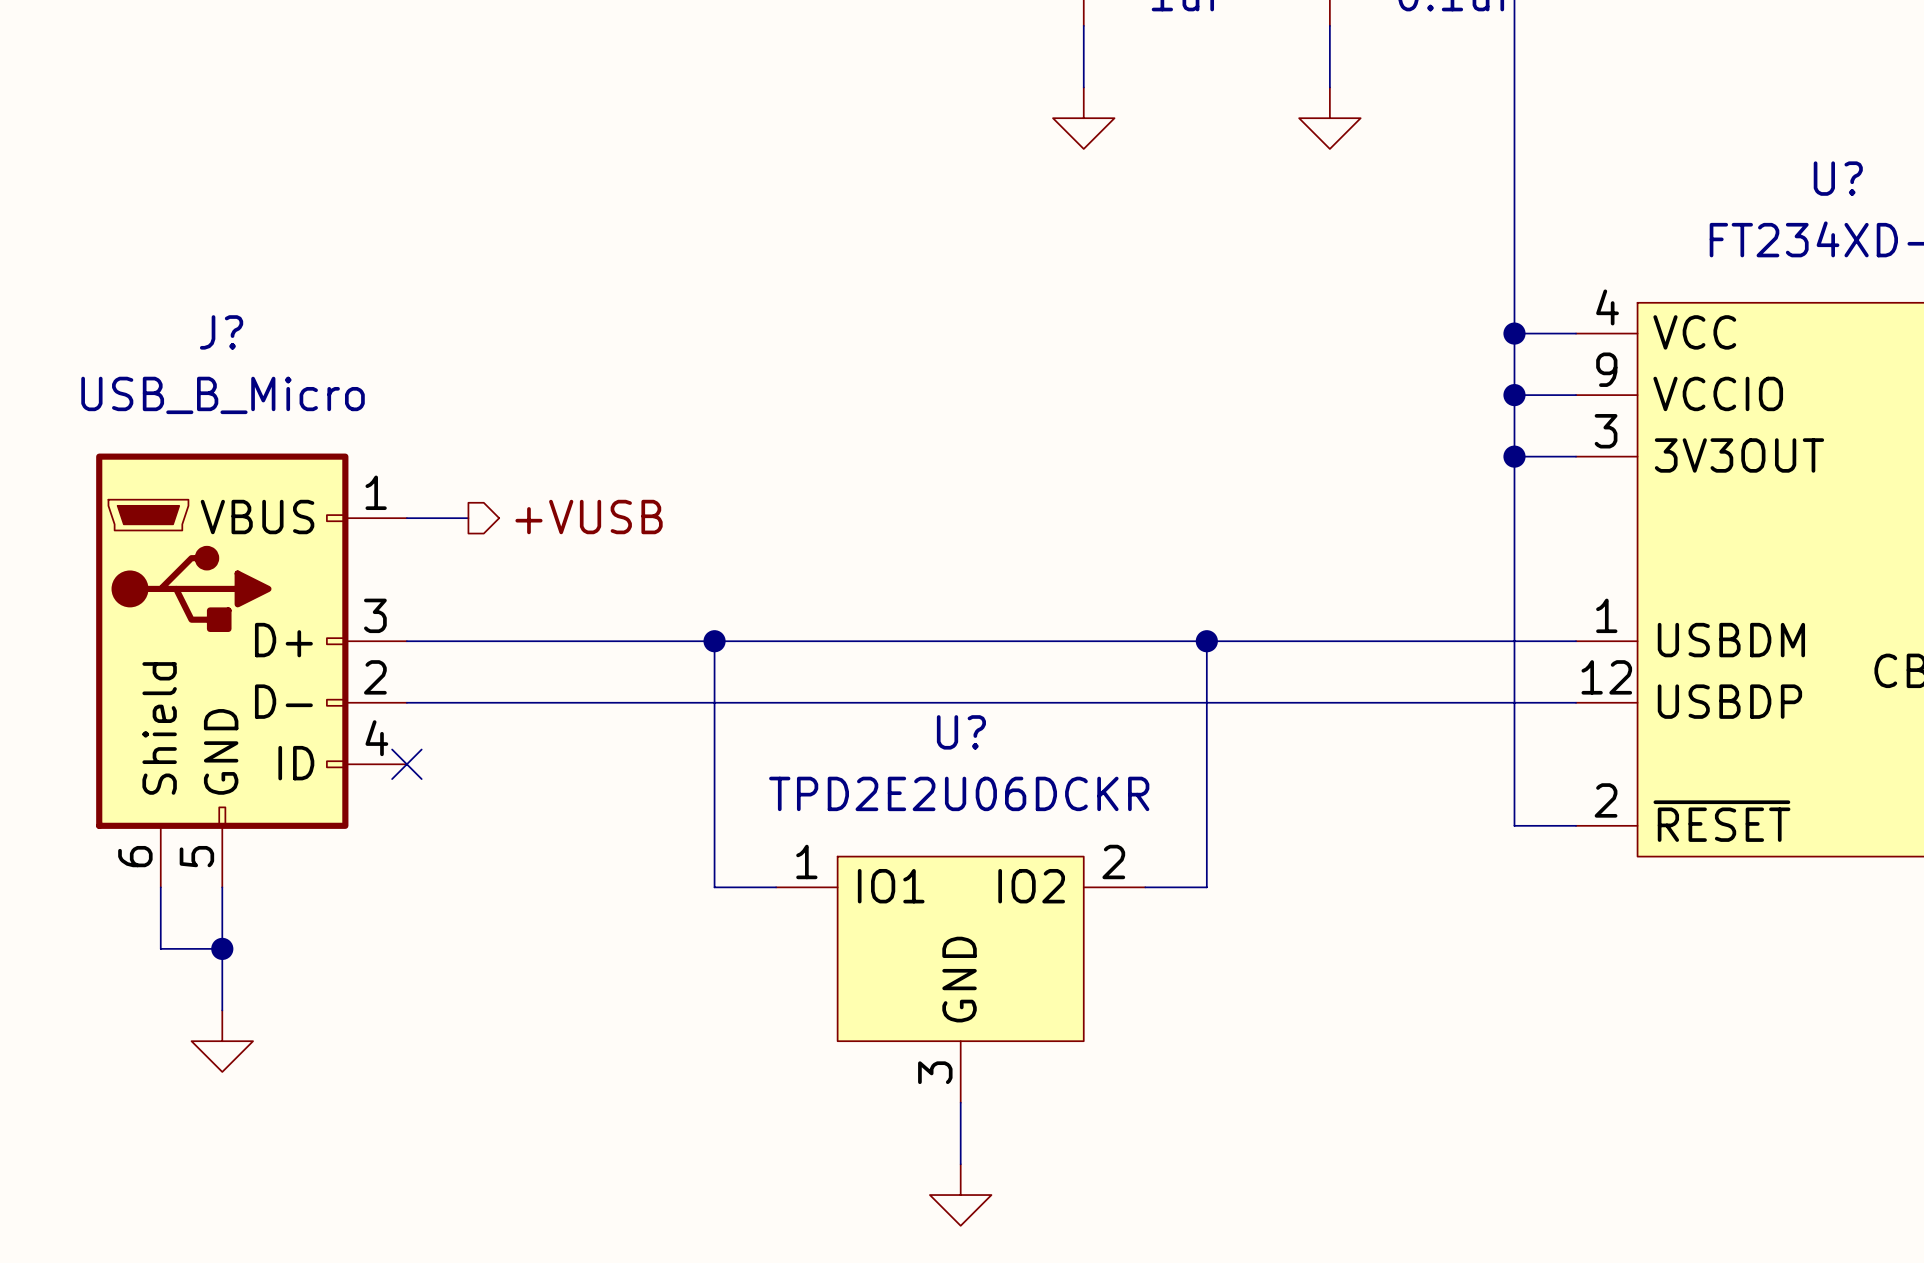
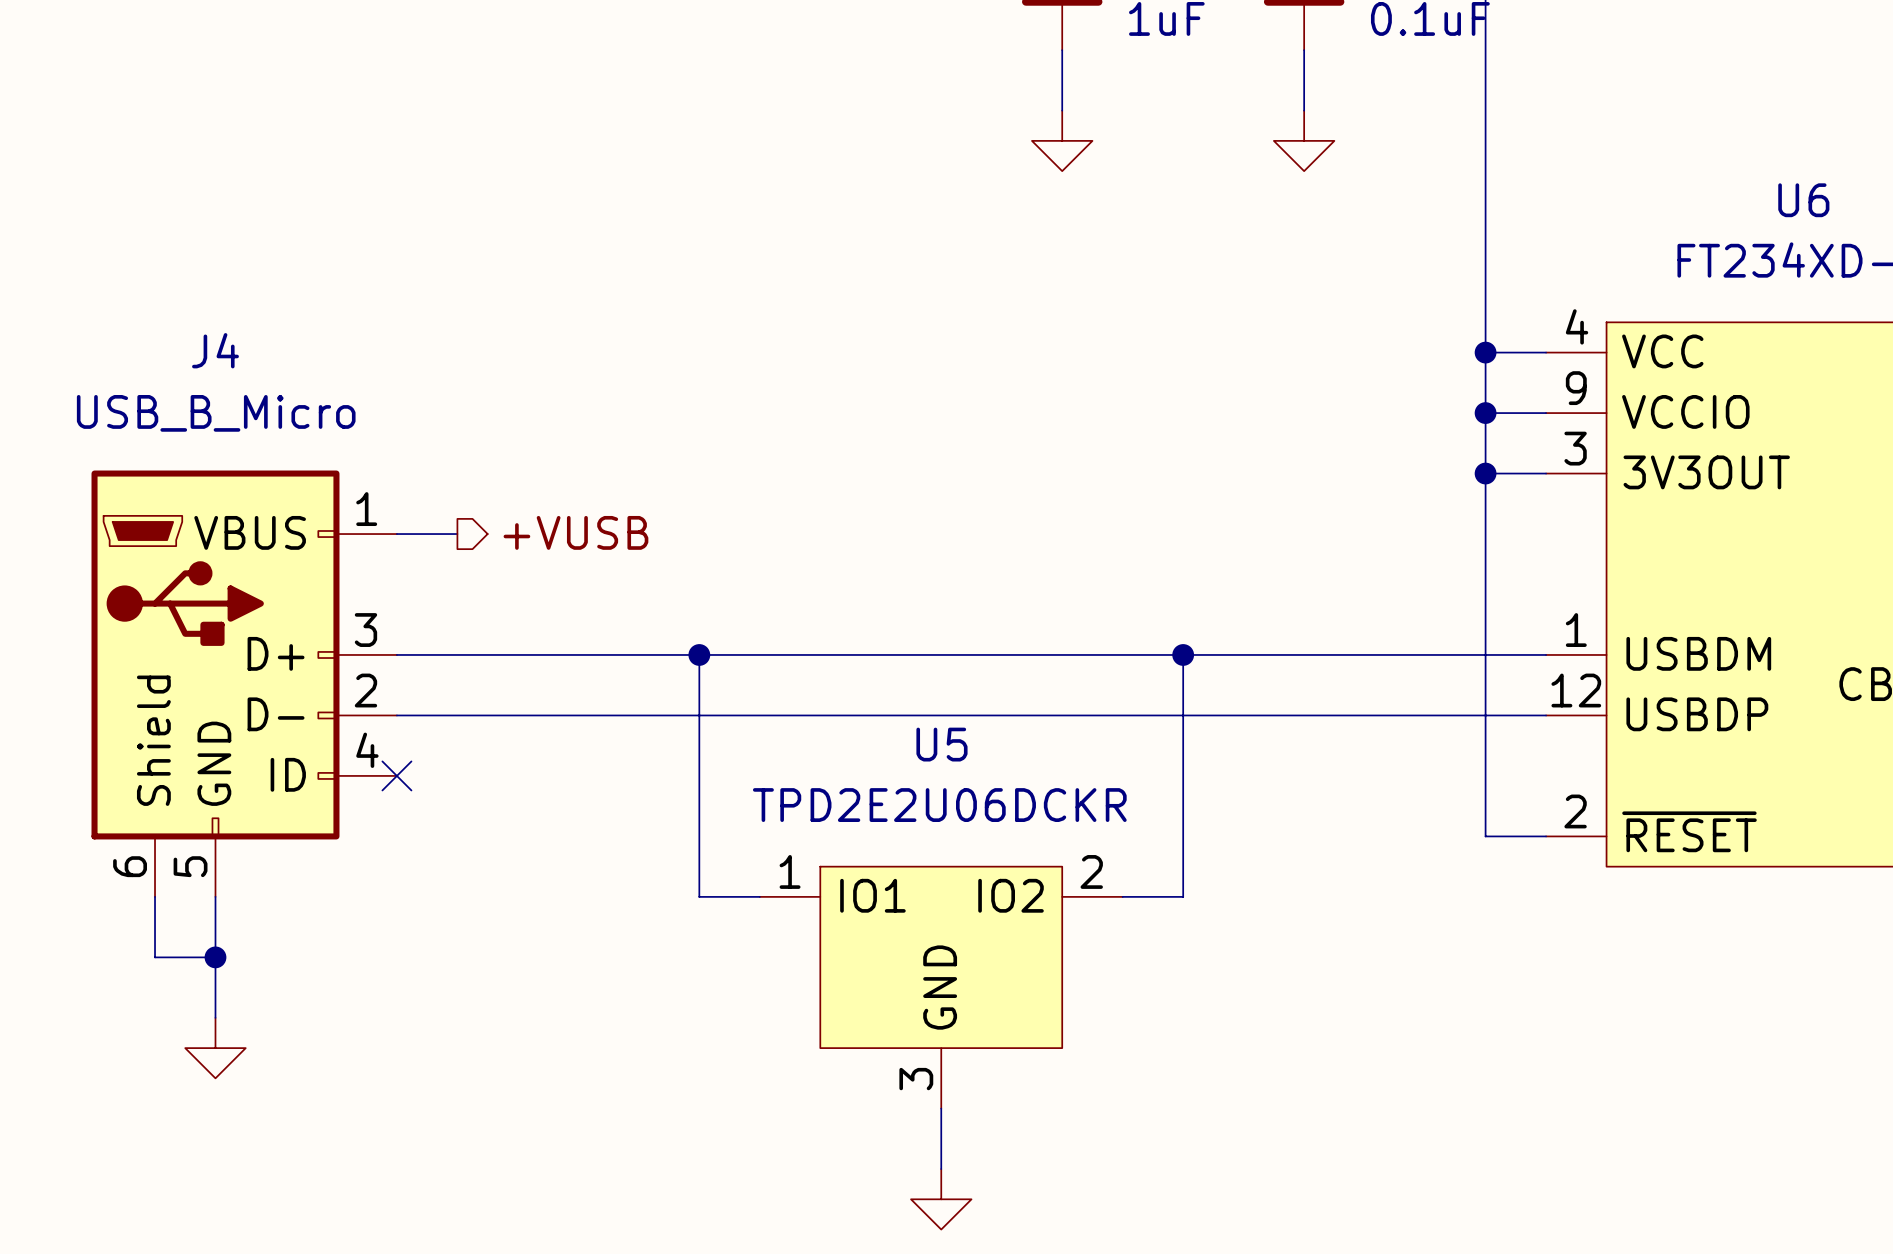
U? name: U? (1838, 178) -> U6 (1803, 200)
J? name: J? (221, 332) -> J4 (215, 350)
U? name: U? (961, 732) -> U5 (941, 744)

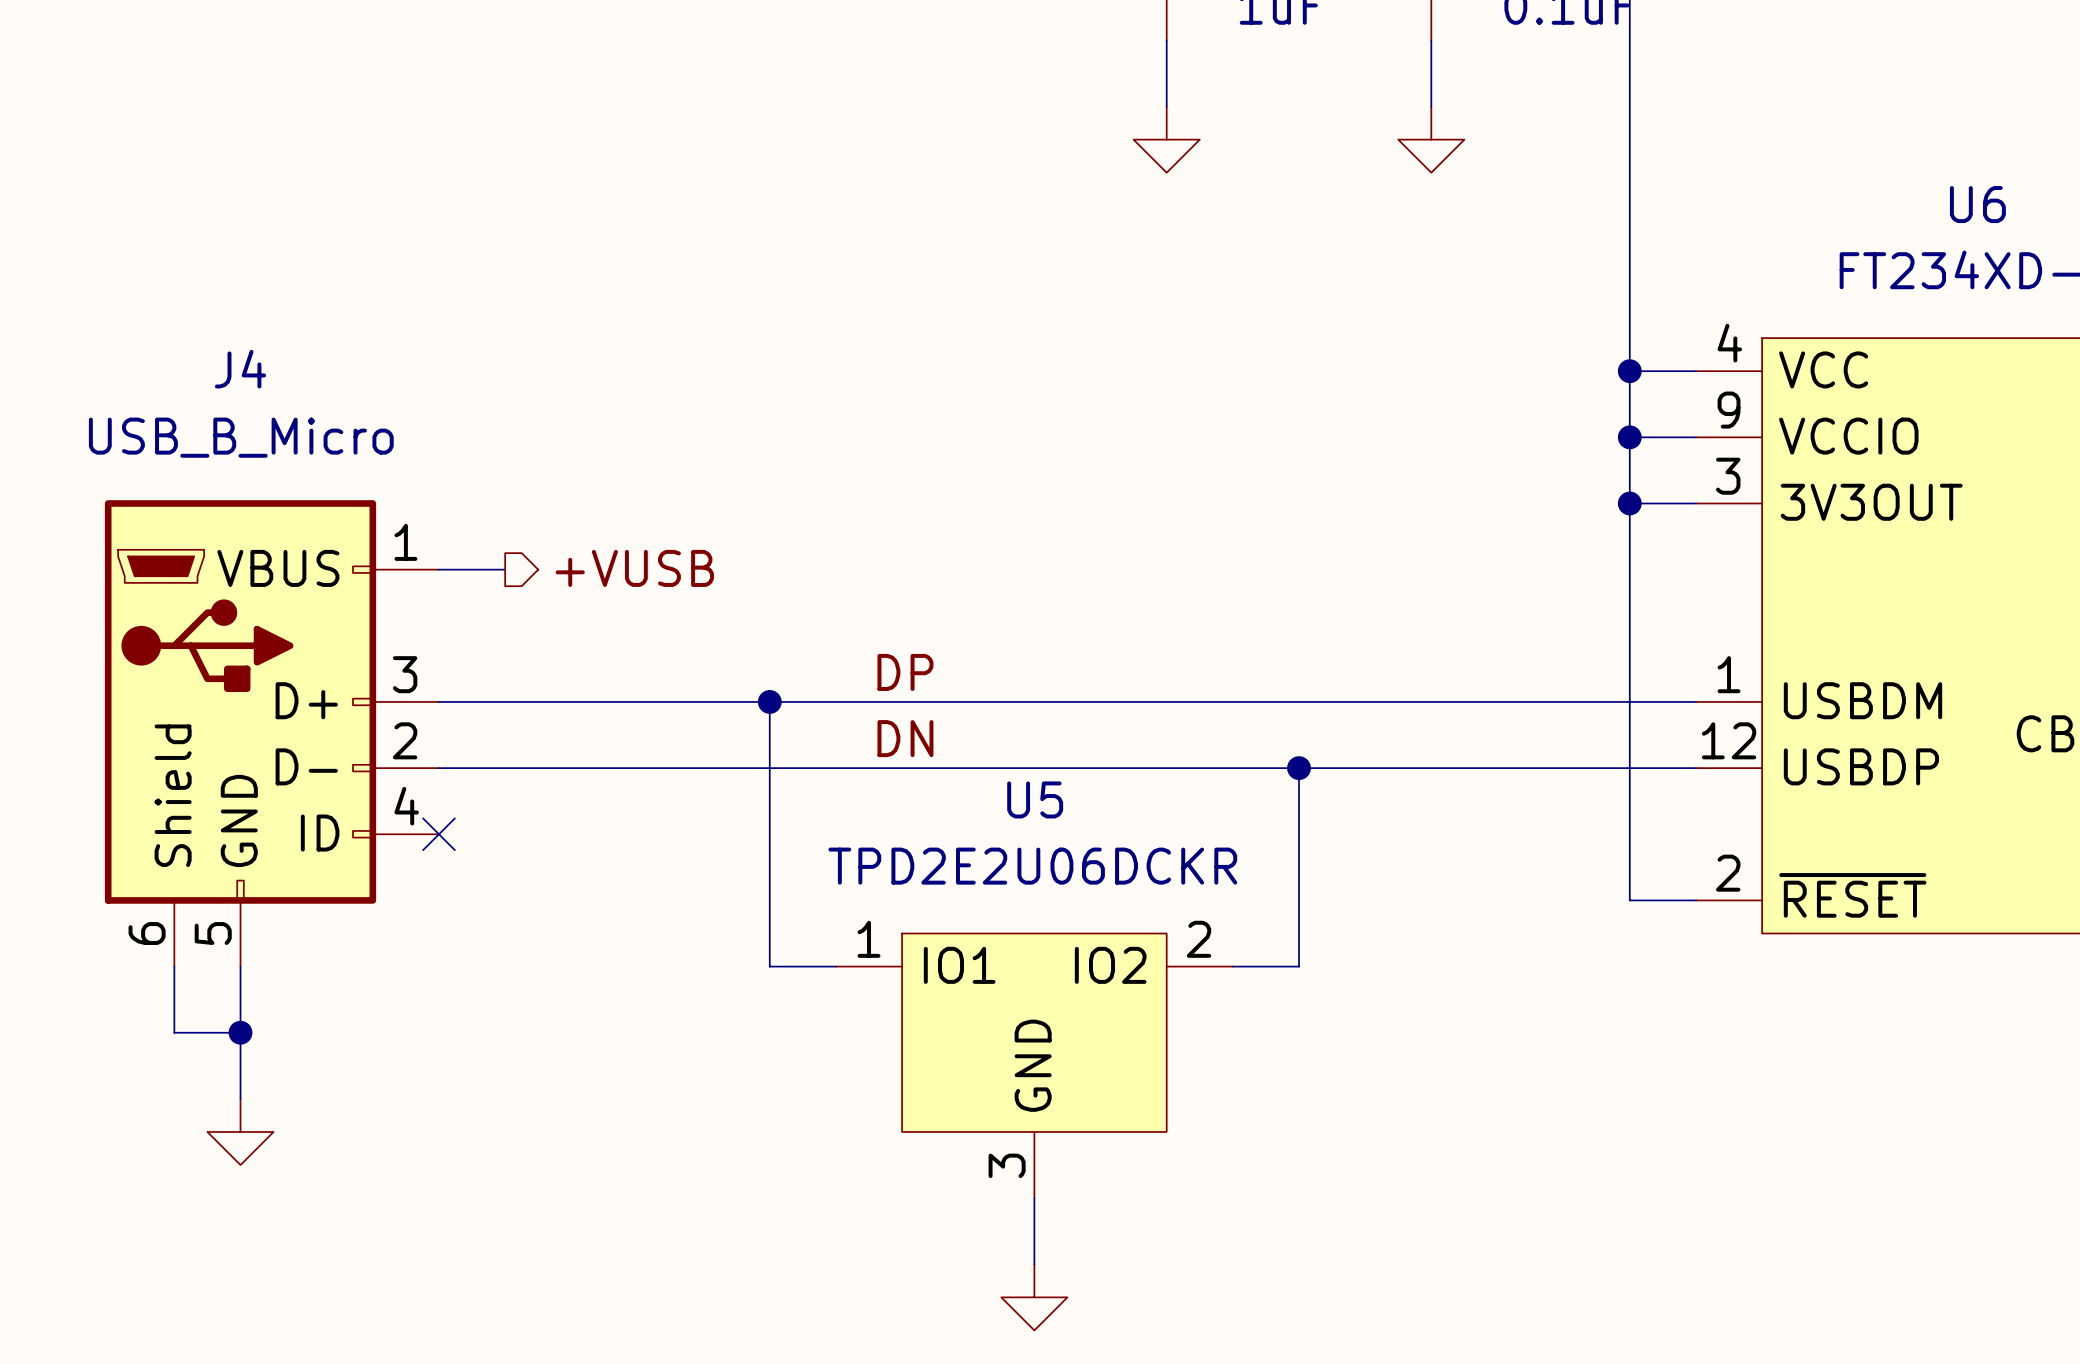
label: none -> DP (905, 672)
wire: (1183, 654) (1183, 715) -> none
junction position: (1183, 654) -> (1299, 768)
label: none -> DN (905, 738)

